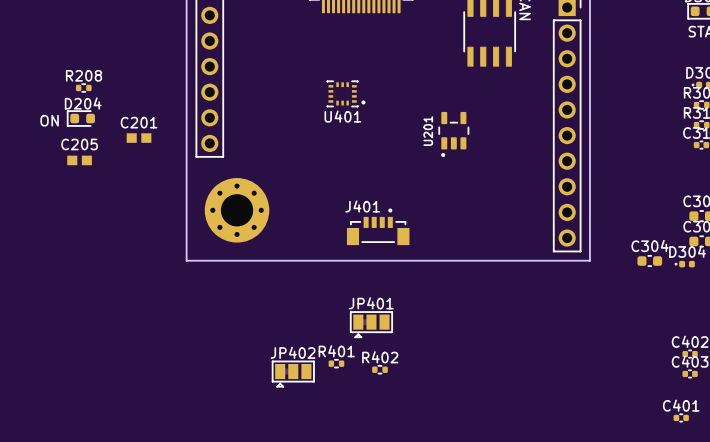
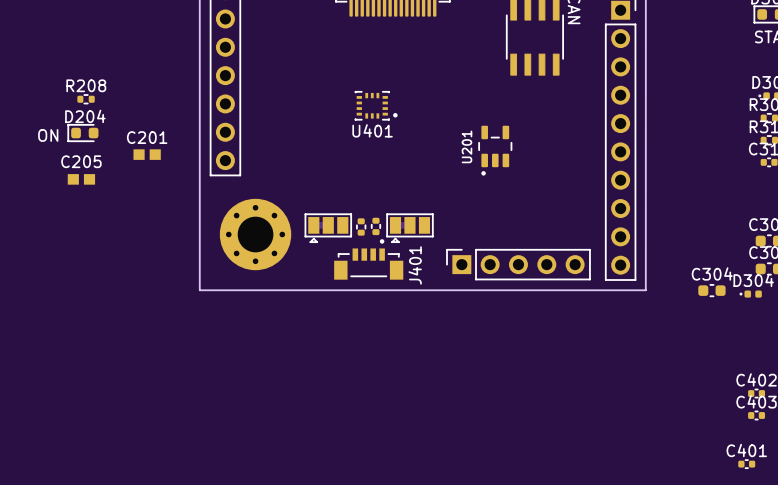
part: none -> (375, 226)
part: none -> (361, 226)
part: none -> (328, 228)
part: none -> (409, 228)
J401 name rotation: 0° (362, 206) -> 90° counterclockwise (415, 265)
J401 position: (378, 226) -> (368, 259)
part: none -> (518, 264)
JP401: (371, 324) -> none
R401: (336, 363) -> none
R402: (379, 369) -> none
JP402: (293, 374) -> none

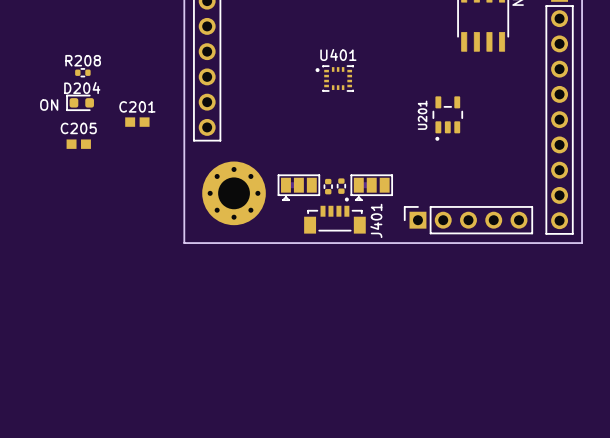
U401 rotation: 0° (376, 105) -> 180° (334, 78)

